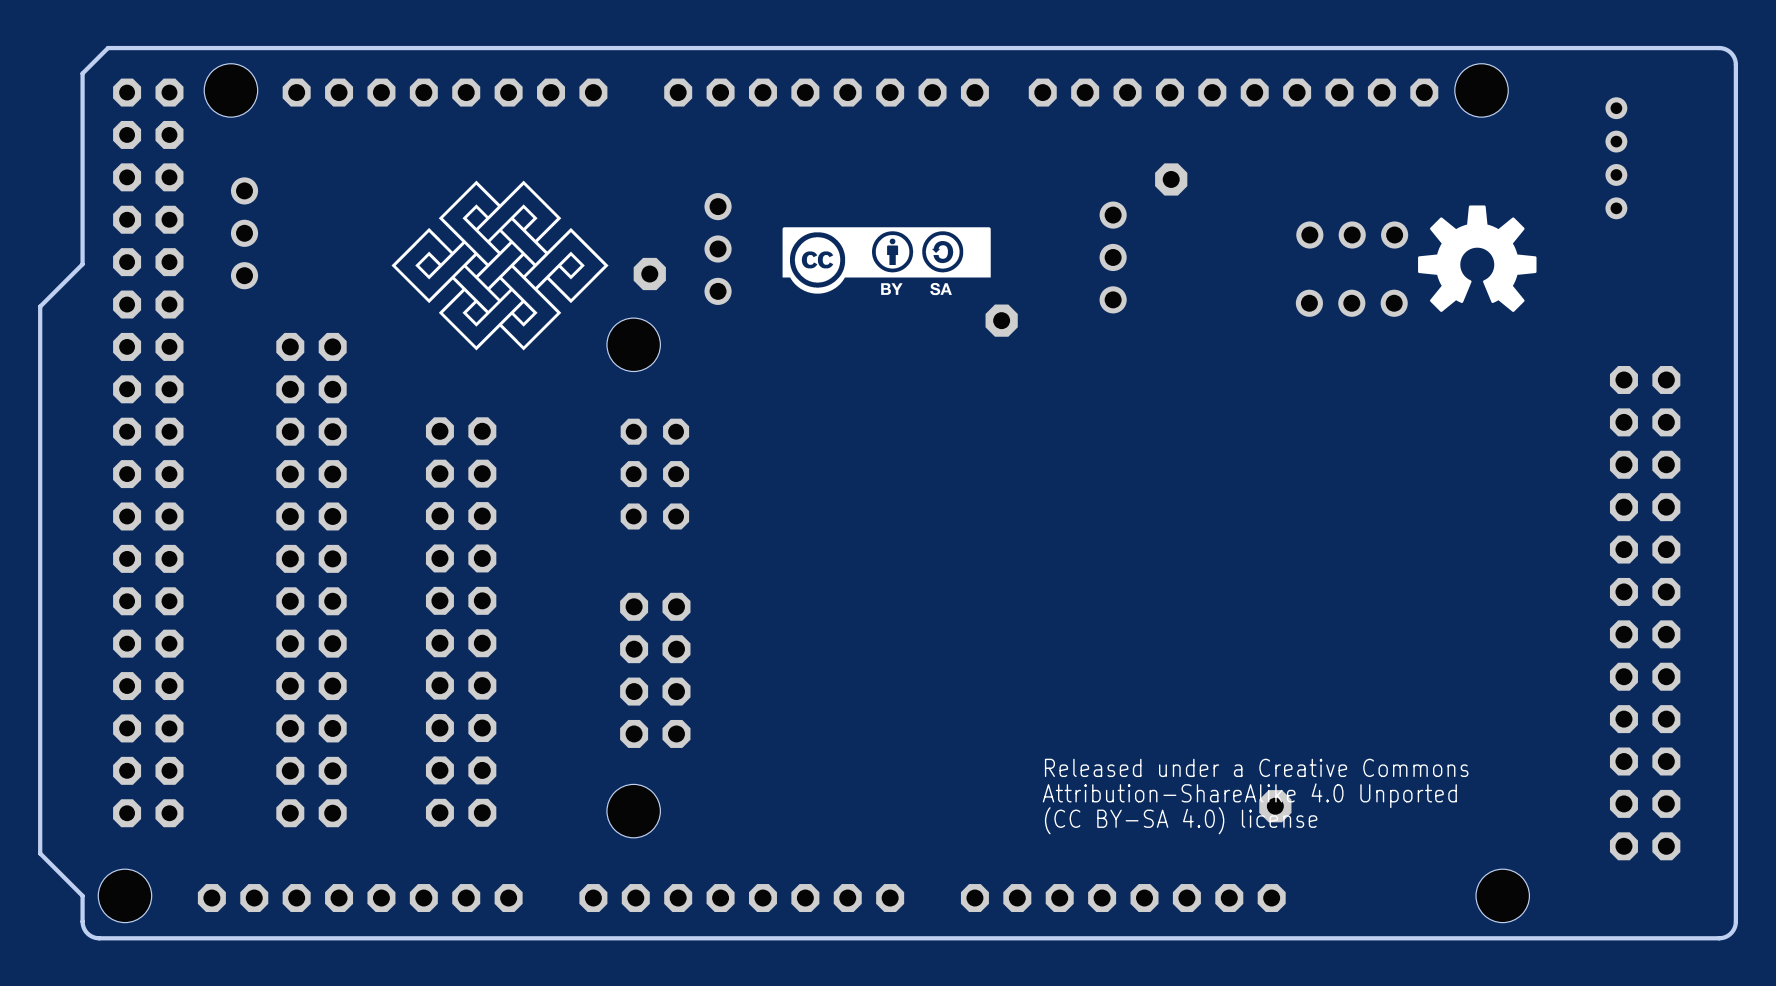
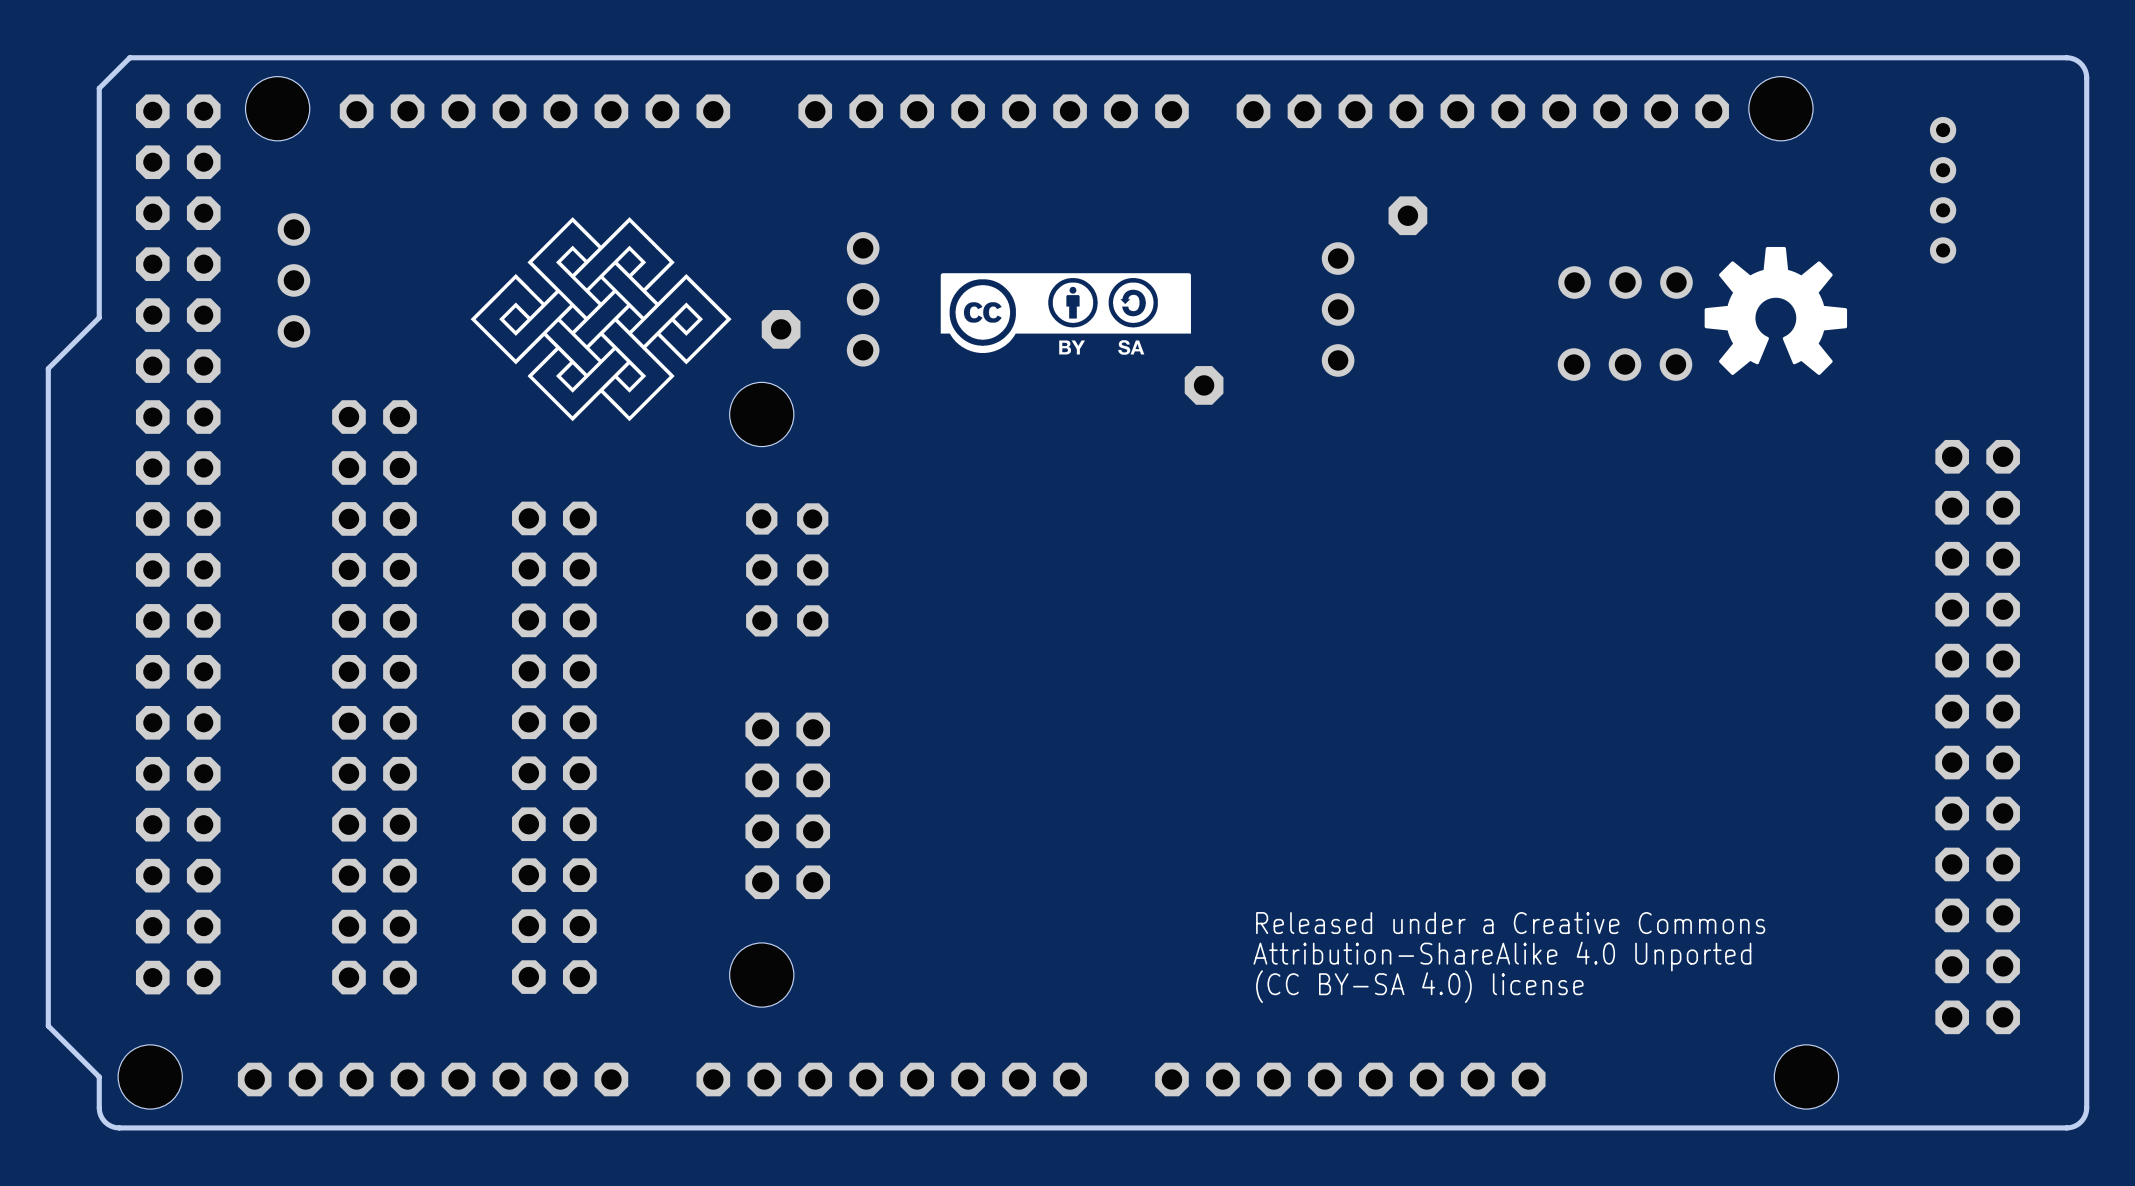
part: (1275, 806) -> none

